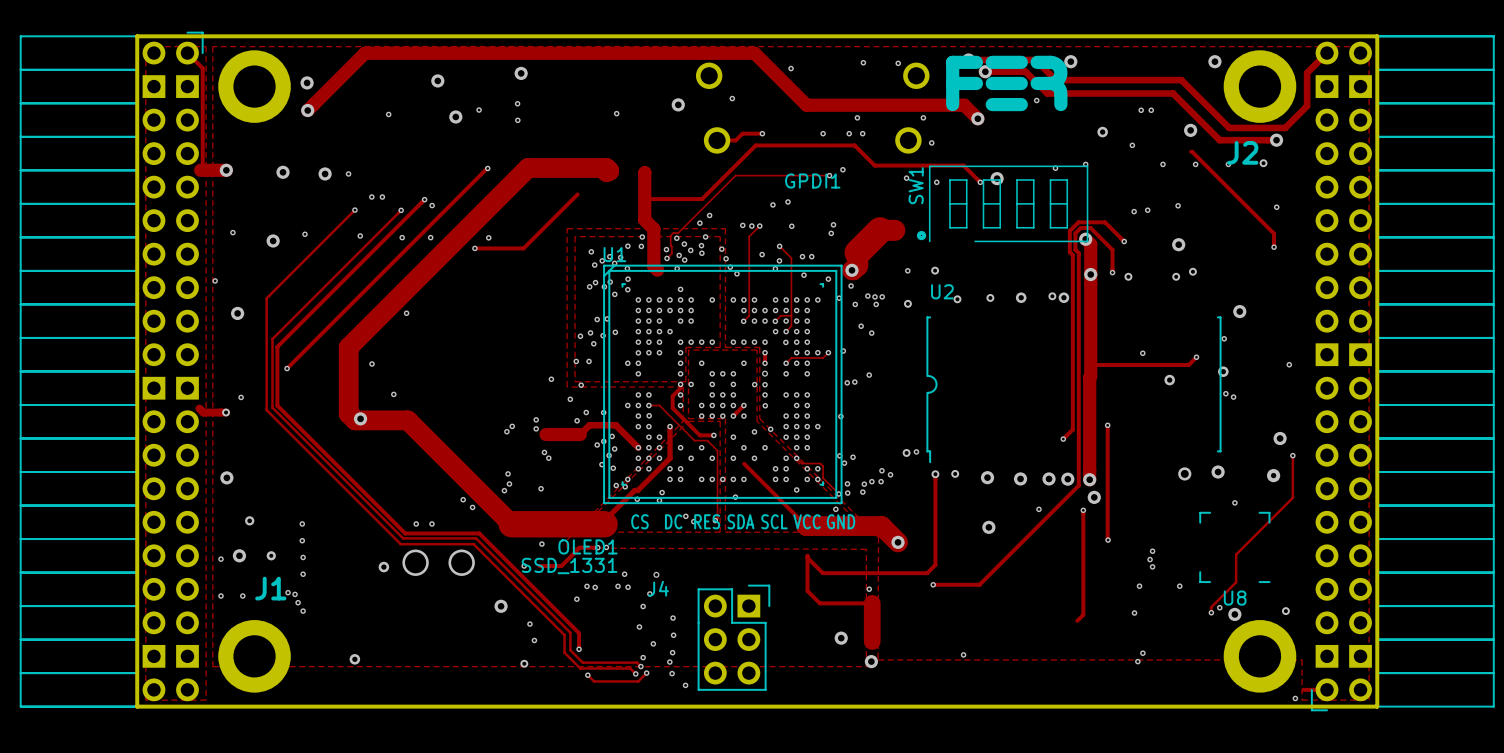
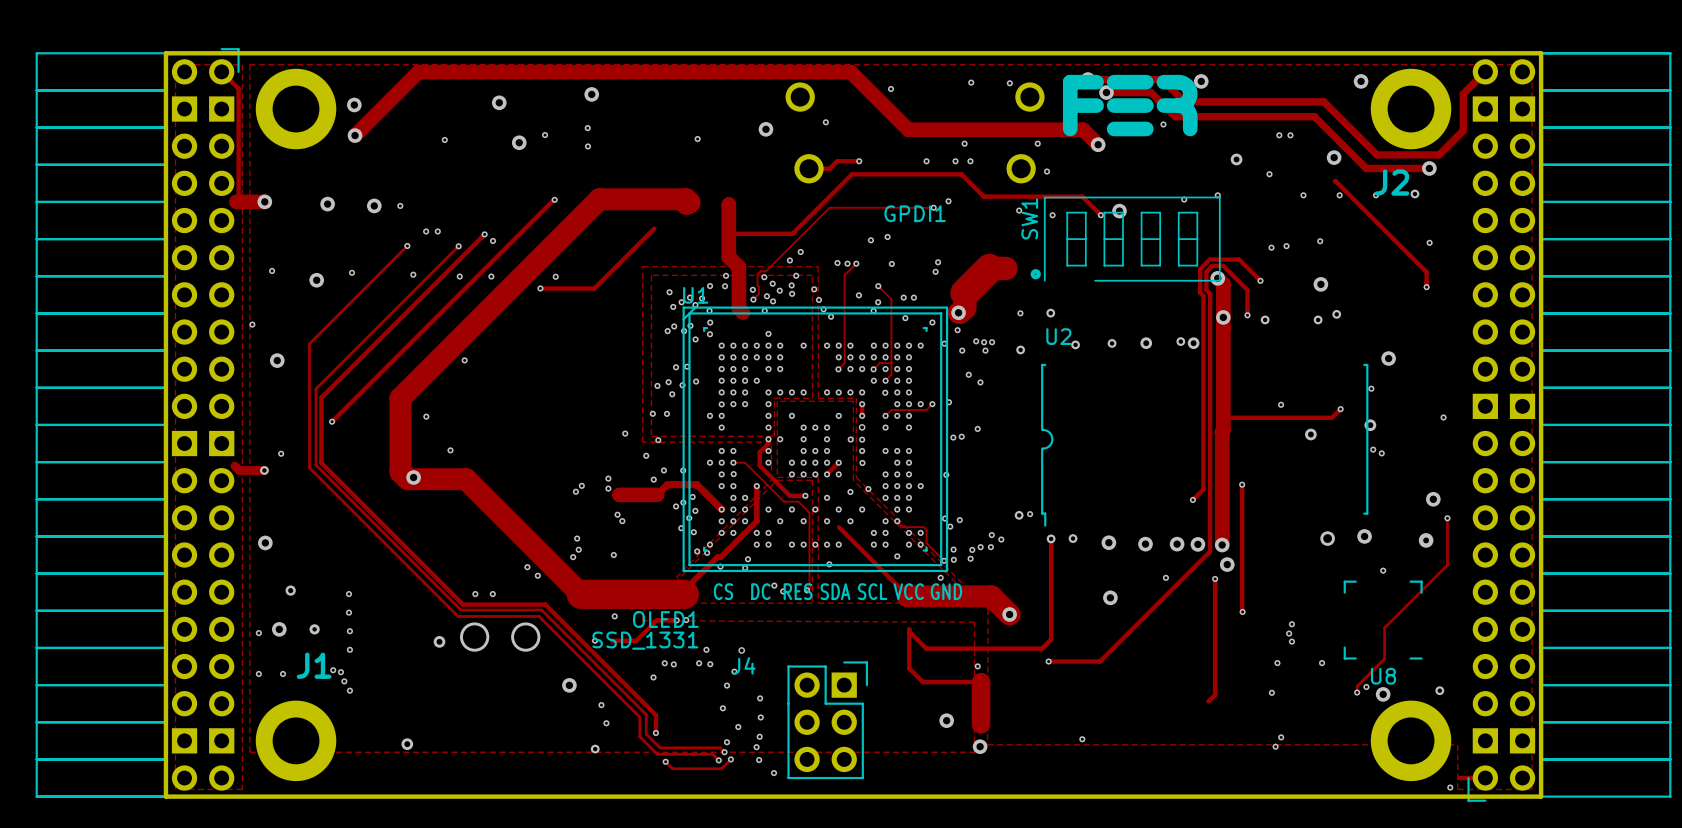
via: none -> (815, 509)

